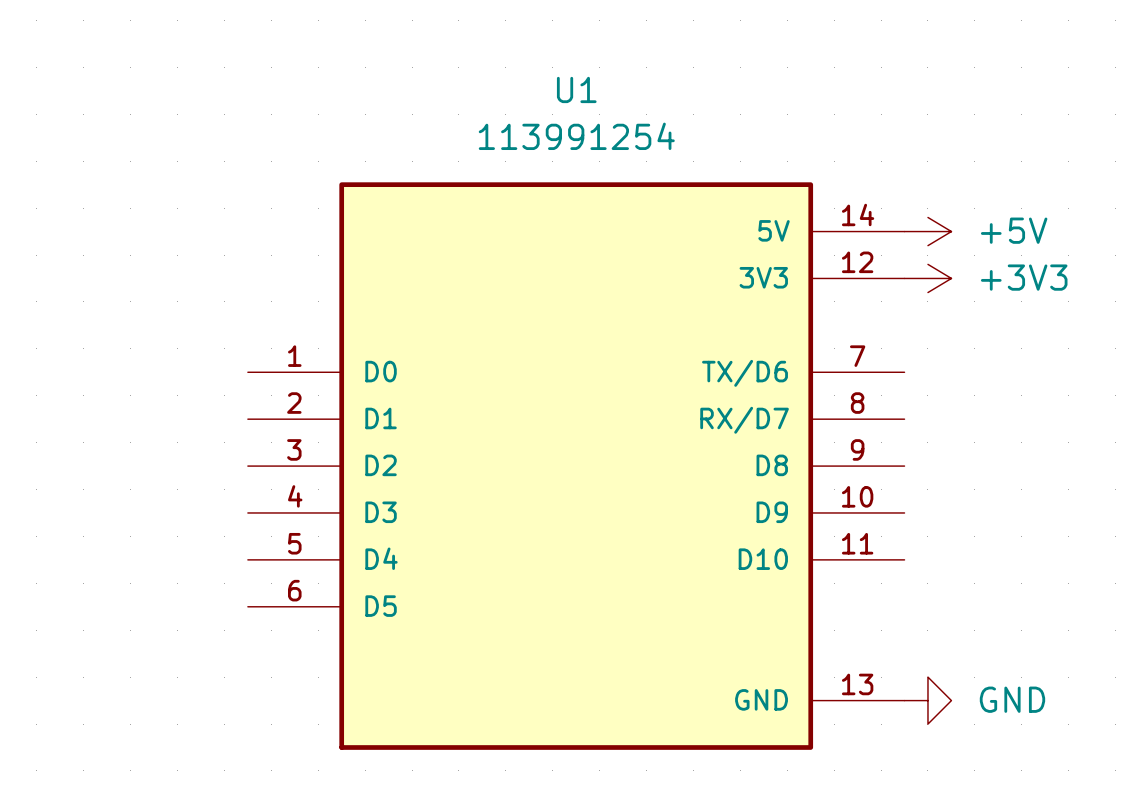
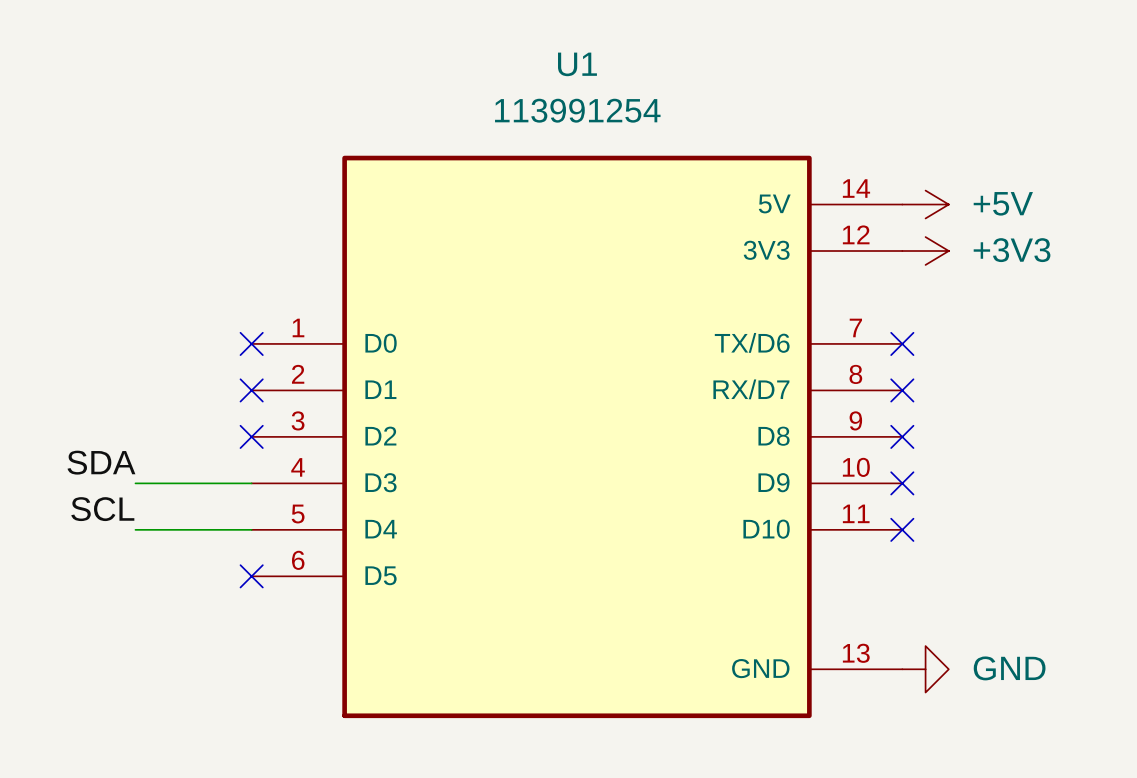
no-connect mark: none -> (251, 343)
no-connect mark: none -> (902, 343)
no-connect mark: none -> (251, 390)
no-connect mark: none -> (902, 390)
no-connect mark: none -> (251, 436)
no-connect mark: none -> (902, 436)
label: none -> SDA (101, 462)
wire: none -> (135, 483) (251, 483)
no-connect mark: none -> (902, 483)
label: none -> SCL (102, 509)
wire: none -> (135, 529) (251, 529)
no-connect mark: none -> (902, 529)
no-connect mark: none -> (251, 576)

